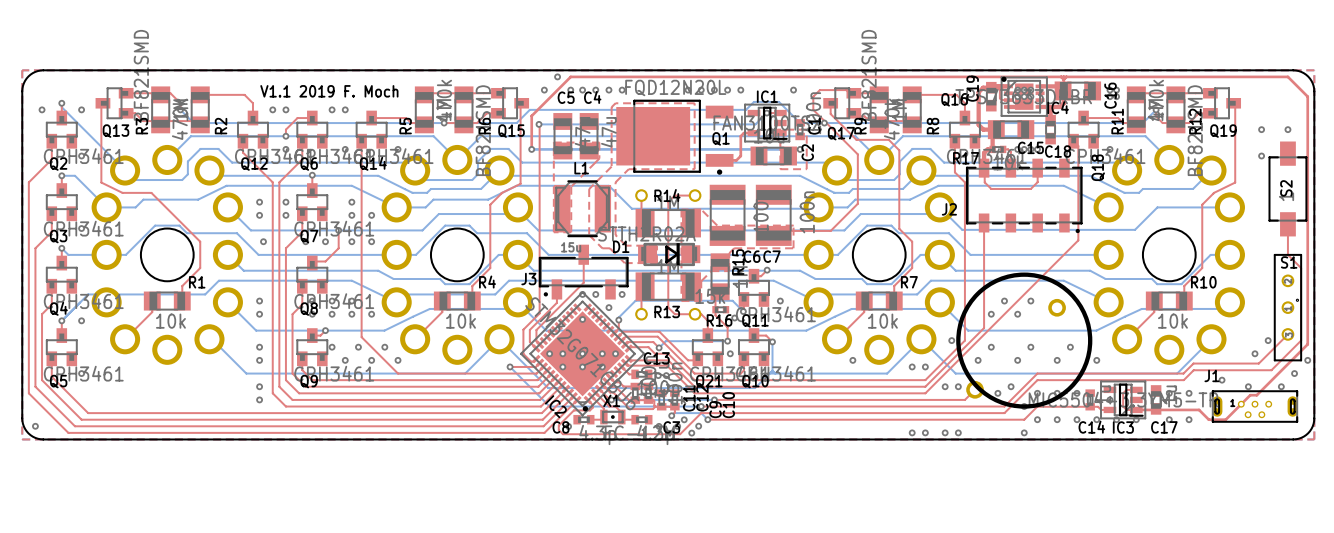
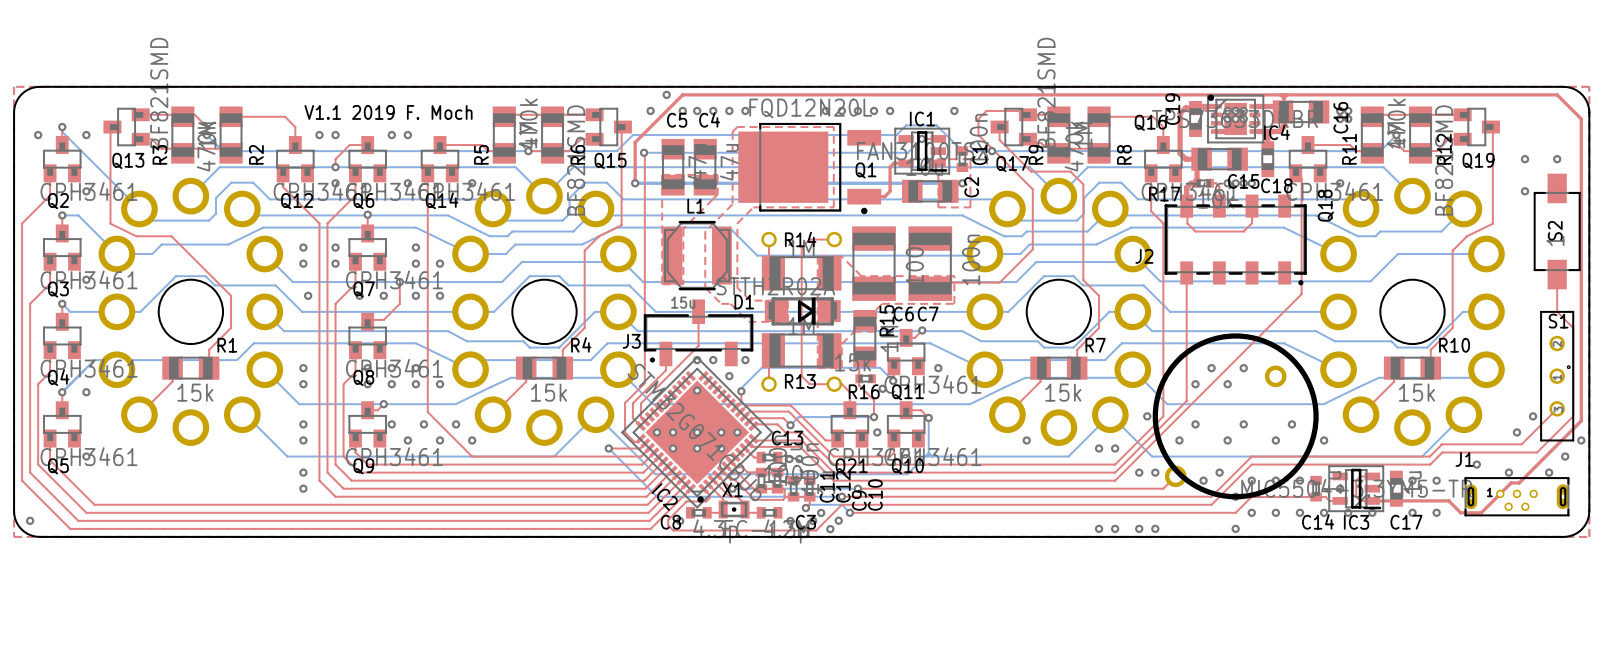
top track: (999, 86) (999, 98) (1008, 100) -> none
R1 value: 10k (170, 321) -> 15k (195, 392)
R4 value: 10k (461, 321) -> 15k (548, 392)
R7 value: 10k (882, 321) -> 15k (1063, 392)
R10 value: 10k (1172, 321) -> 15k (1416, 392)

